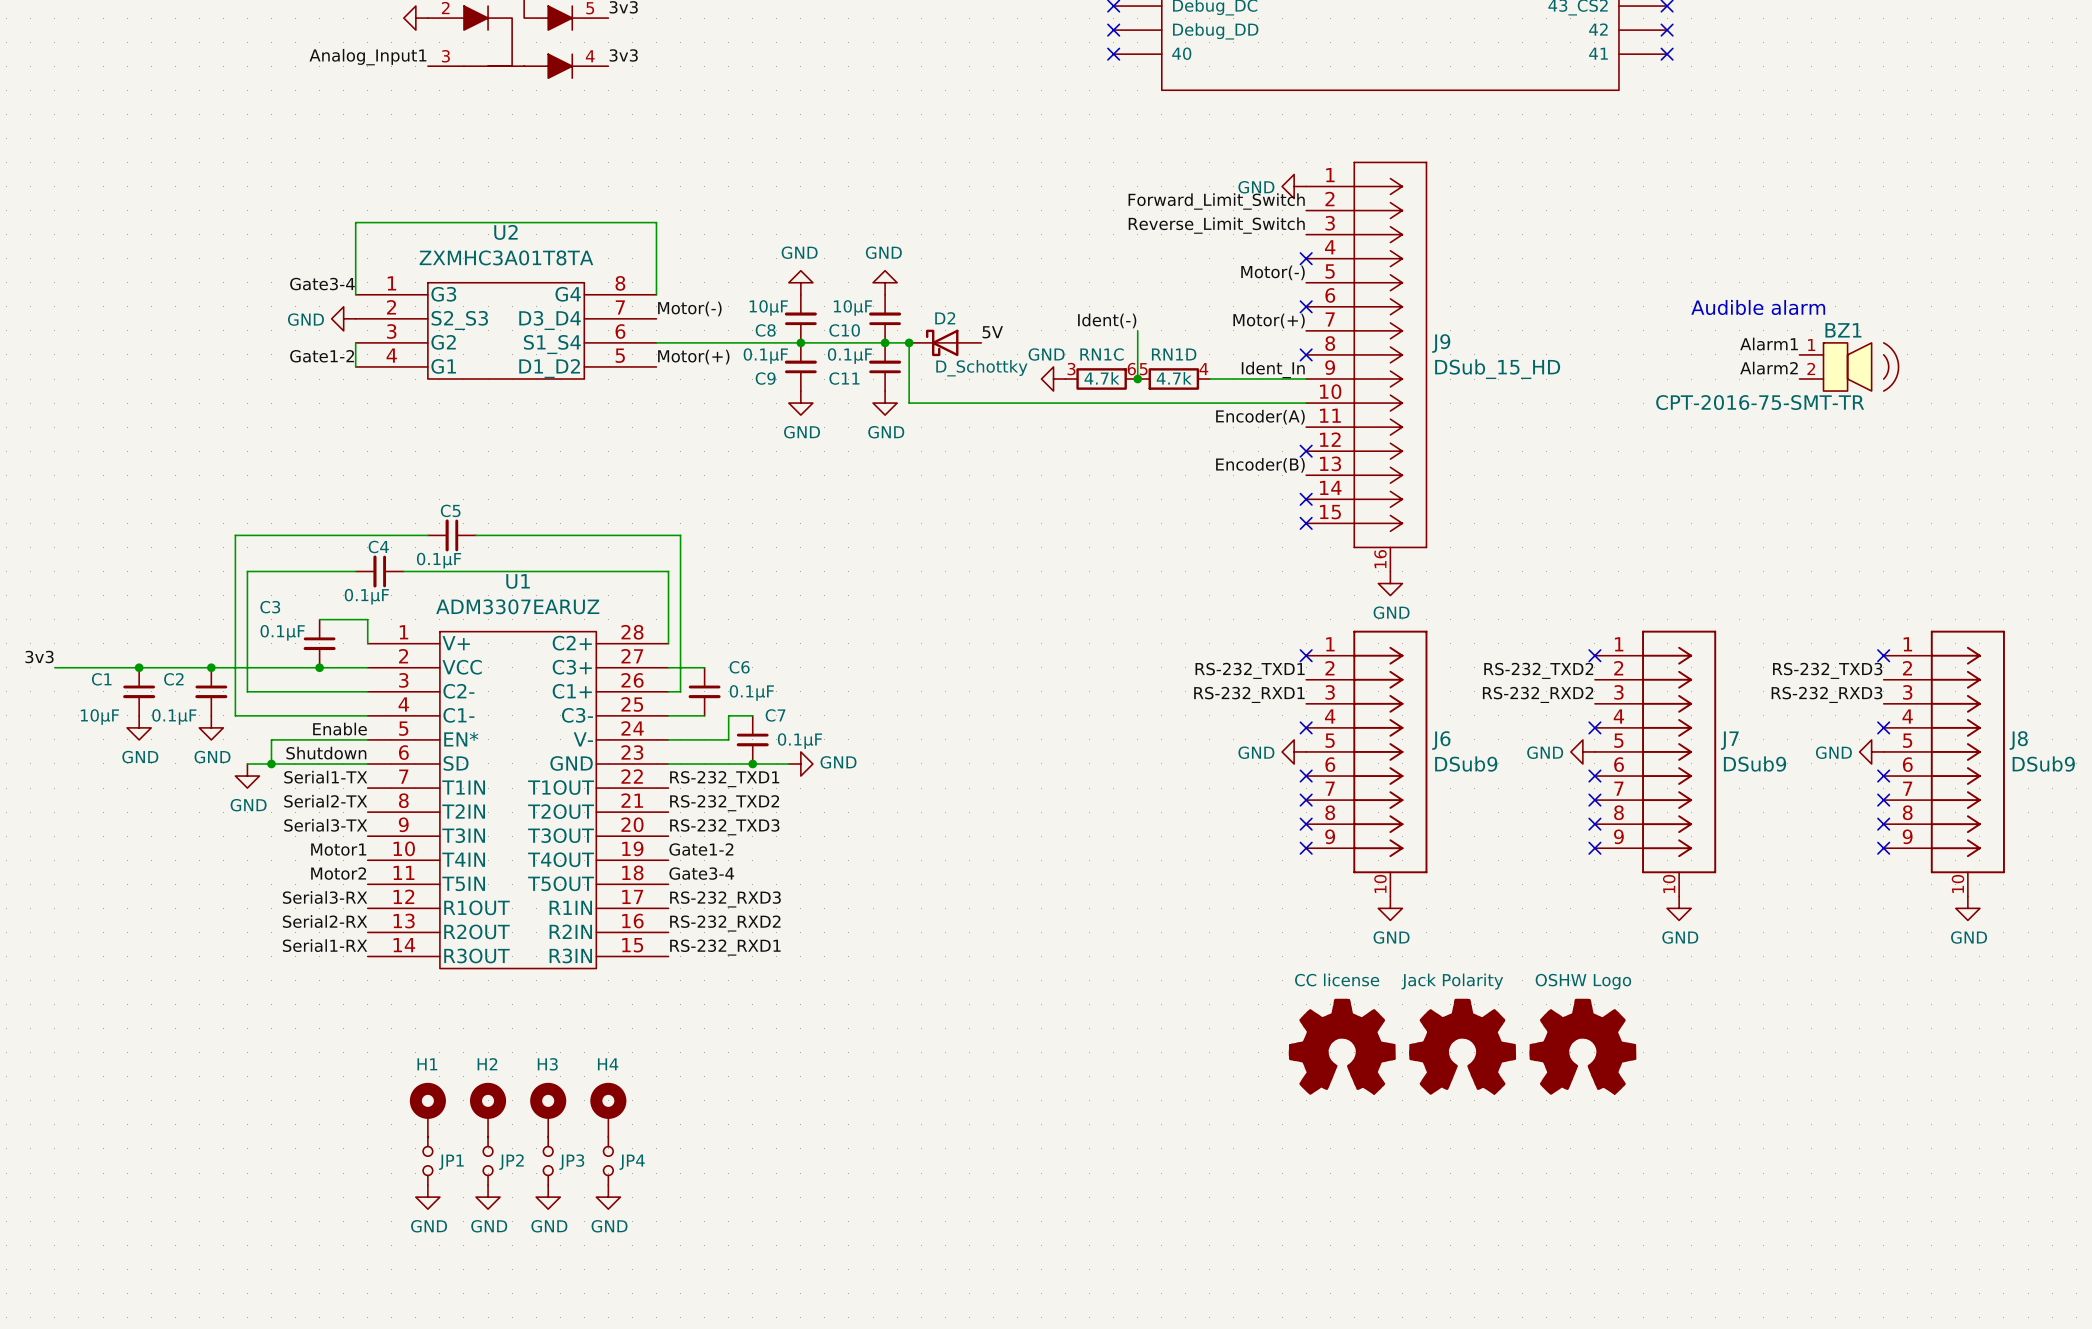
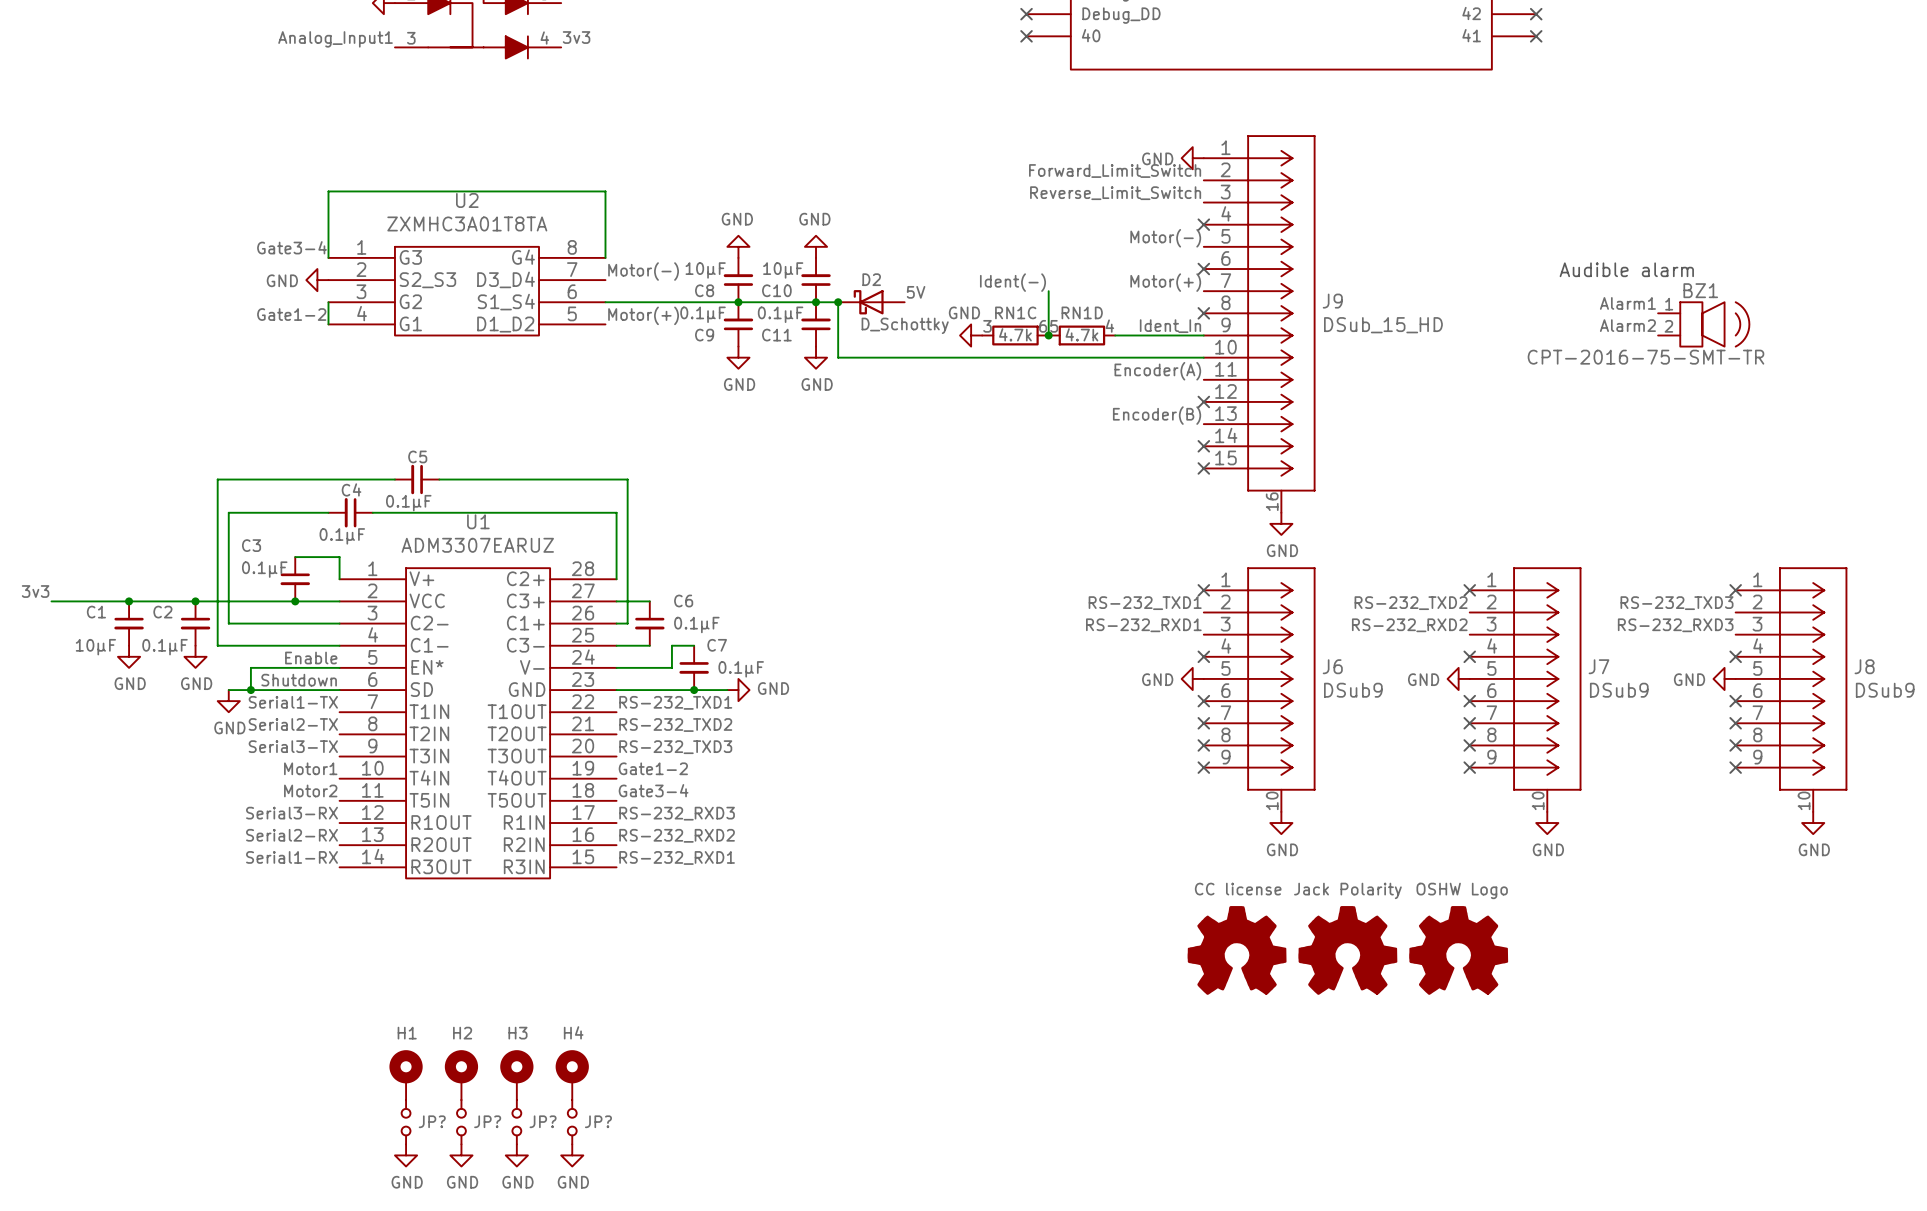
H1 position: (427, 1109) -> (406, 1075)
H2 position: (488, 1109) -> (461, 1075)
H3 position: (548, 1109) -> (516, 1075)
H4 position: (608, 1109) -> (572, 1075)
JP1: (427, 1161) -> none
JP2: (488, 1161) -> none
JP3: (548, 1161) -> none
JP4: (608, 1161) -> none
power symbol: GND (427, 1197) -> none
power symbol: GND (488, 1197) -> none
power symbol: GND (548, 1197) -> none
power symbol: GND (608, 1197) -> none
JP?: none -> (406, 1122)
JP?: none -> (461, 1122)
JP?: none -> (516, 1122)
JP?: none -> (572, 1122)
power symbol: none -> GND (406, 1155)
power symbol: none -> GND (461, 1155)
power symbol: none -> GND (516, 1155)
power symbol: none -> GND (572, 1155)

